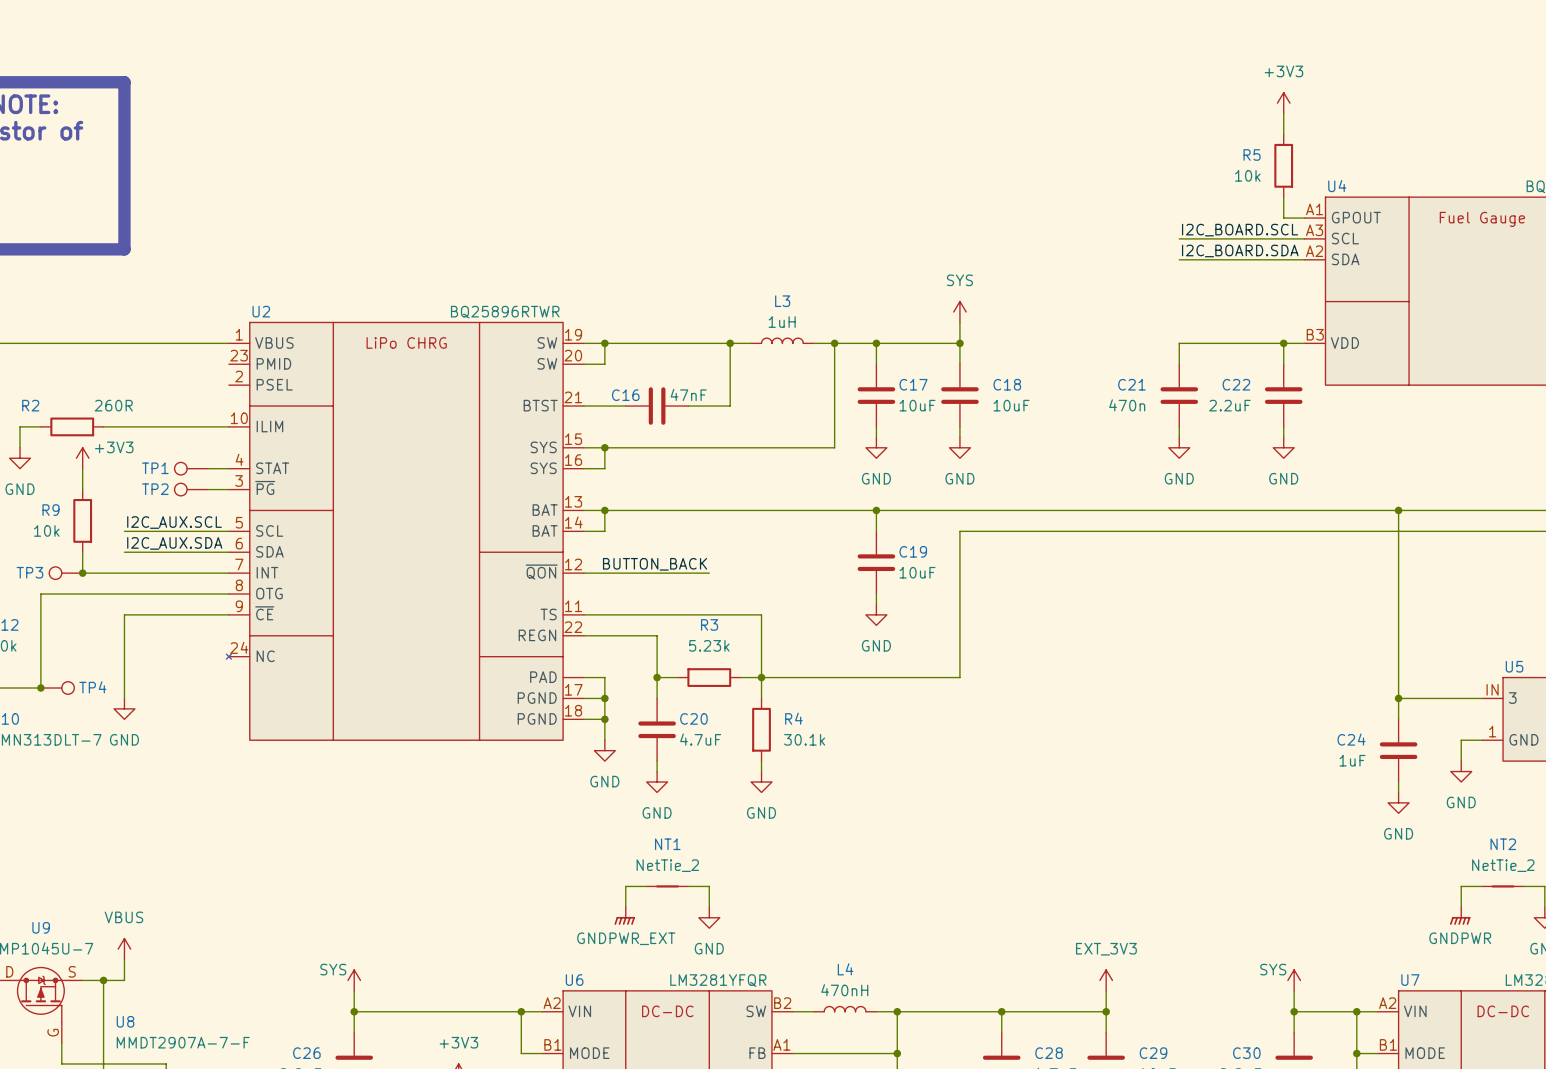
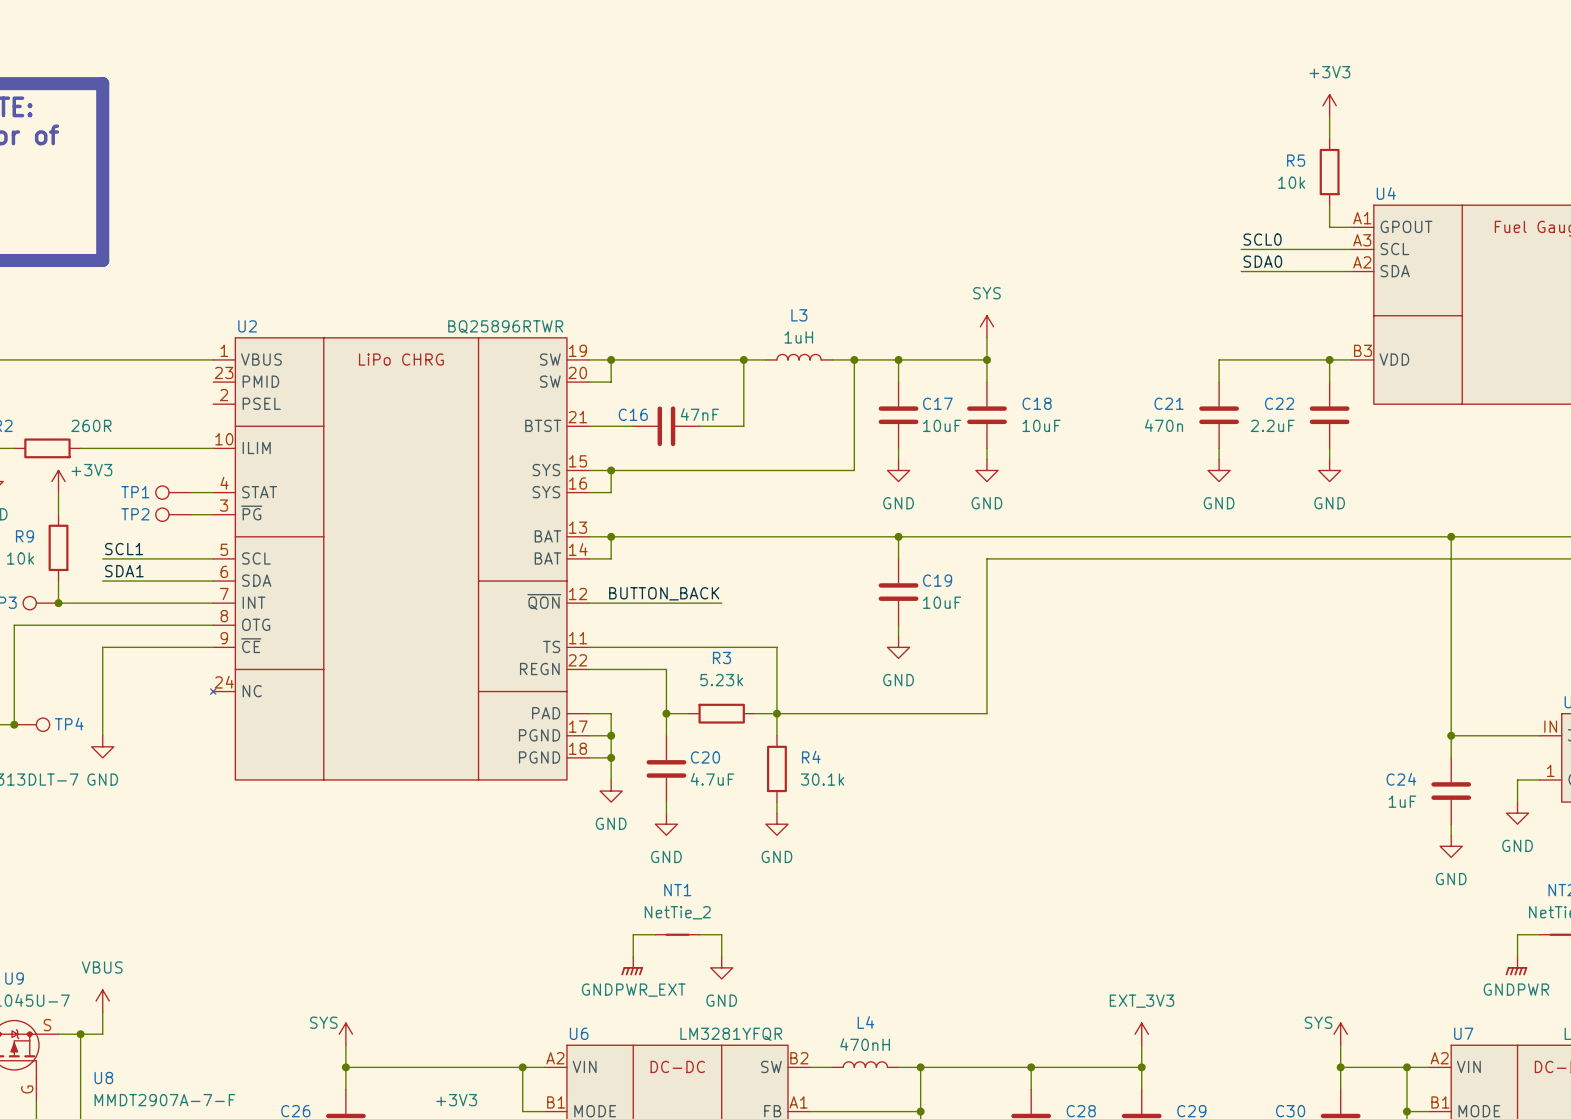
label: none -> SCL0 (1262, 239)
label: I2C_BOARD.SCL (1240, 230) -> none
wire: (1179, 238) (1200, 238) -> none
label: none -> SDA0 (1262, 261)
label: I2C_BOARD.SDA (1240, 250) -> none
wire: (1179, 259) (1200, 259) -> none
label: I2C_AUX.SCL (174, 522) -> SCL1 (124, 549)
label: I2C_AUX.SDA (174, 543) -> SDA1 (124, 571)

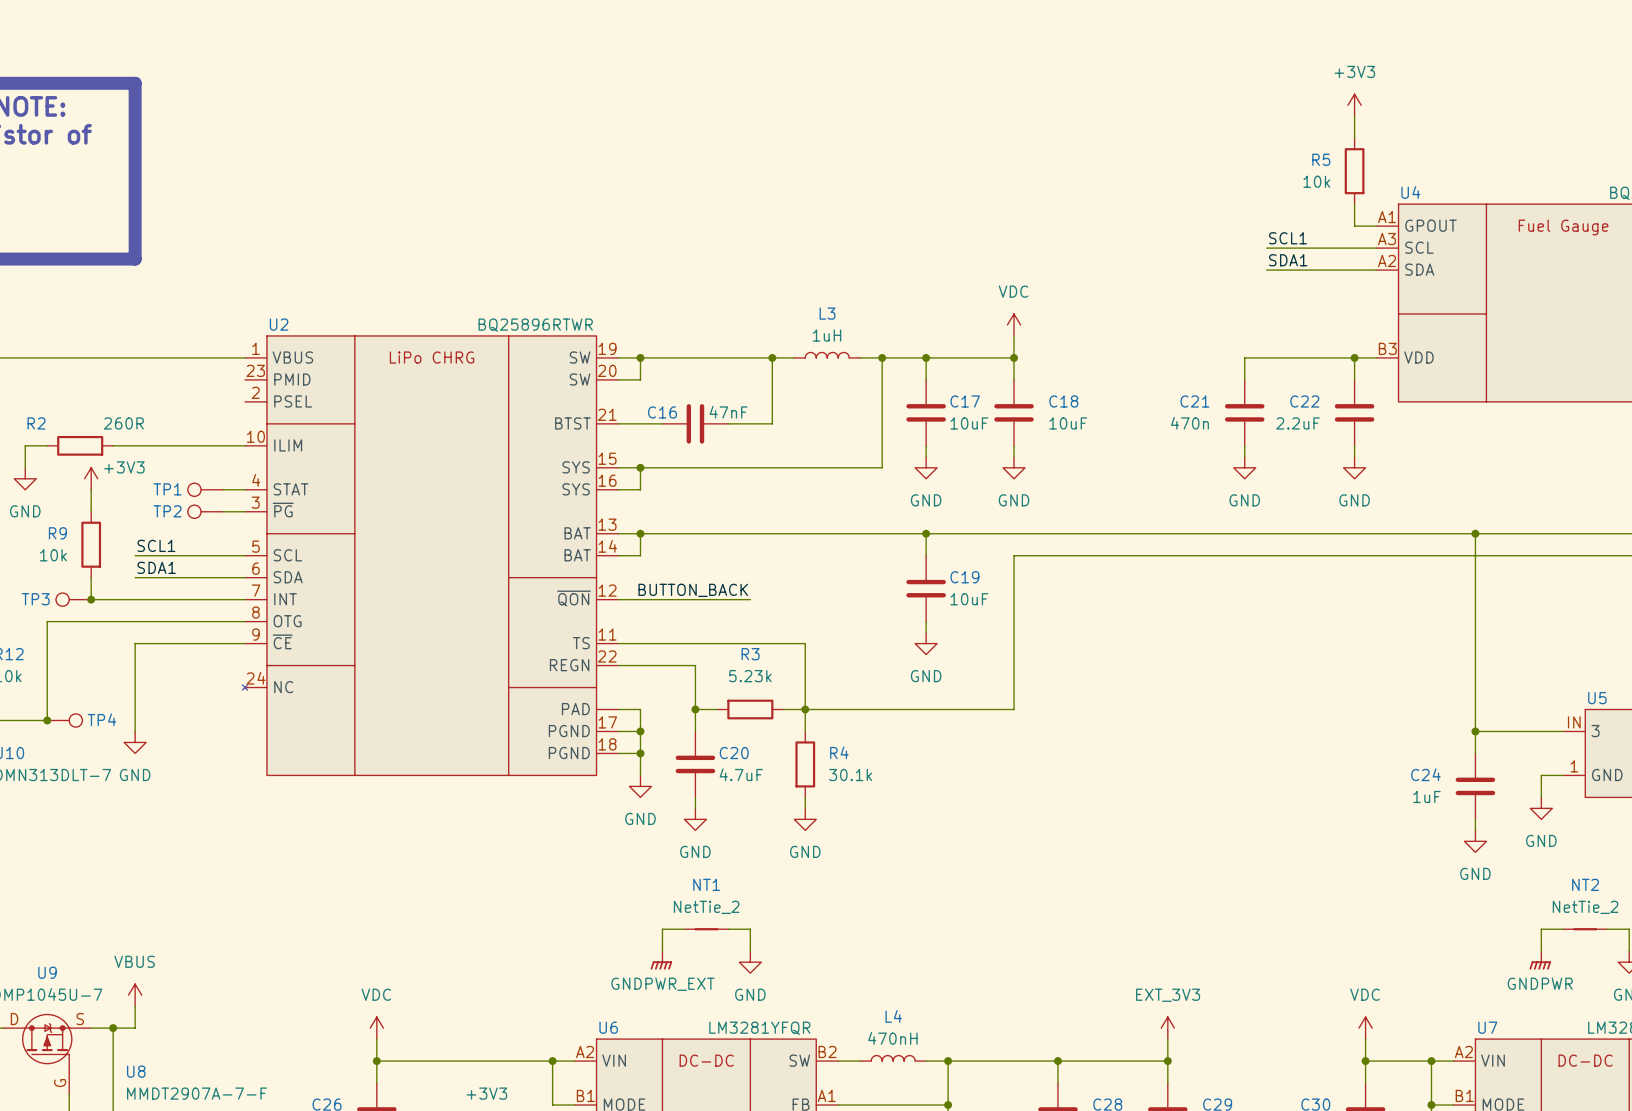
label: SCL0 (1262, 239) -> SCL1 (1287, 238)
label: SDA0 (1262, 261) -> SDA1 (1288, 260)
power symbol: SYS (986, 326) -> VDC (1014, 324)
power symbol: SYS (345, 1034) -> VDC (376, 1028)
power symbol: SYS (1340, 1034) -> VDC (1365, 1028)

